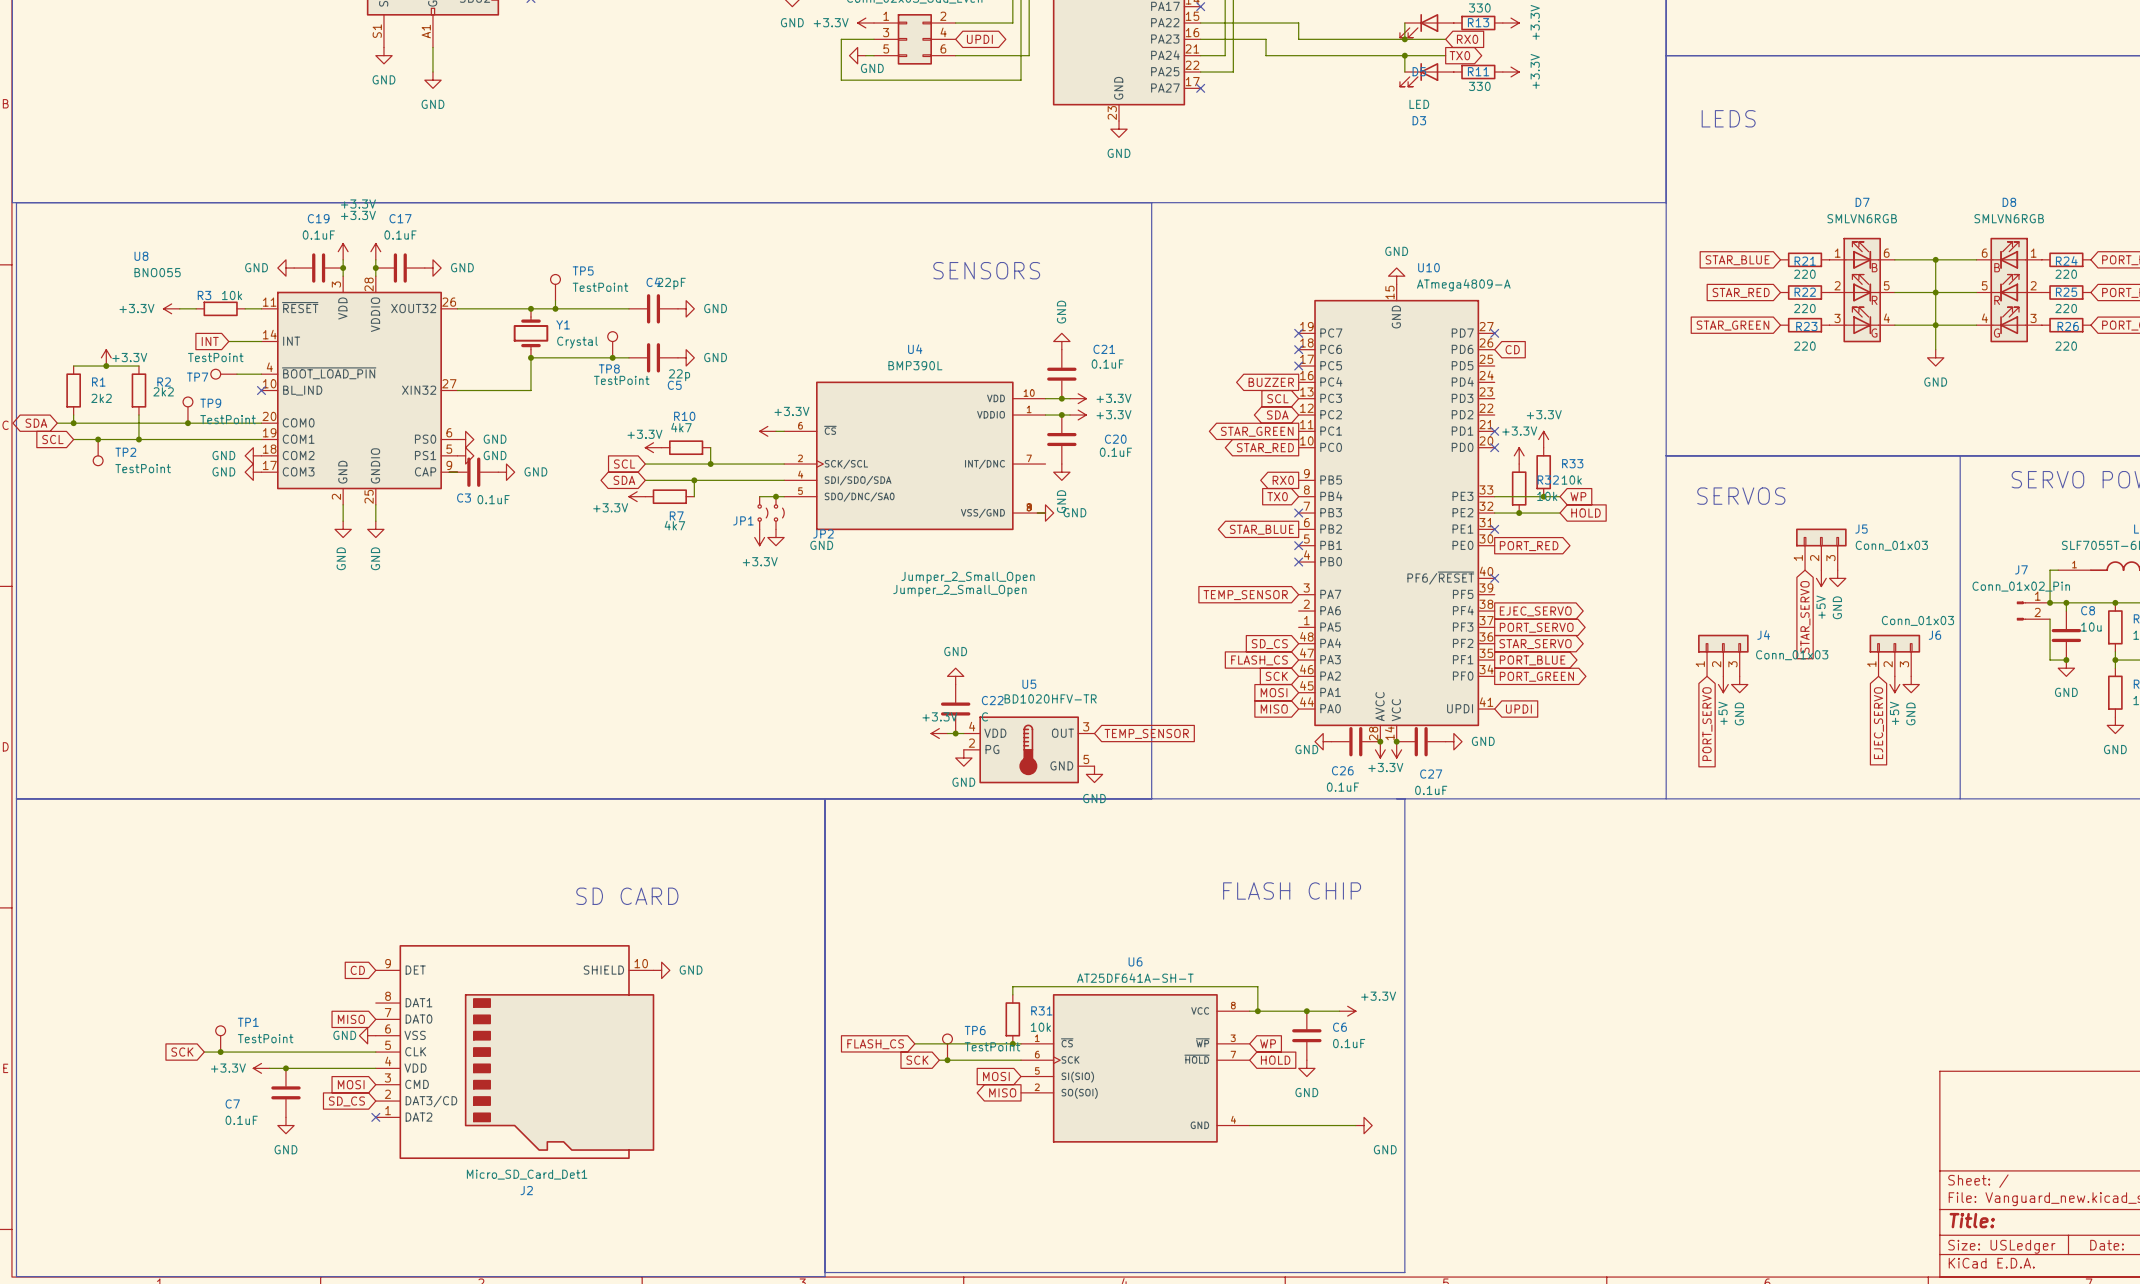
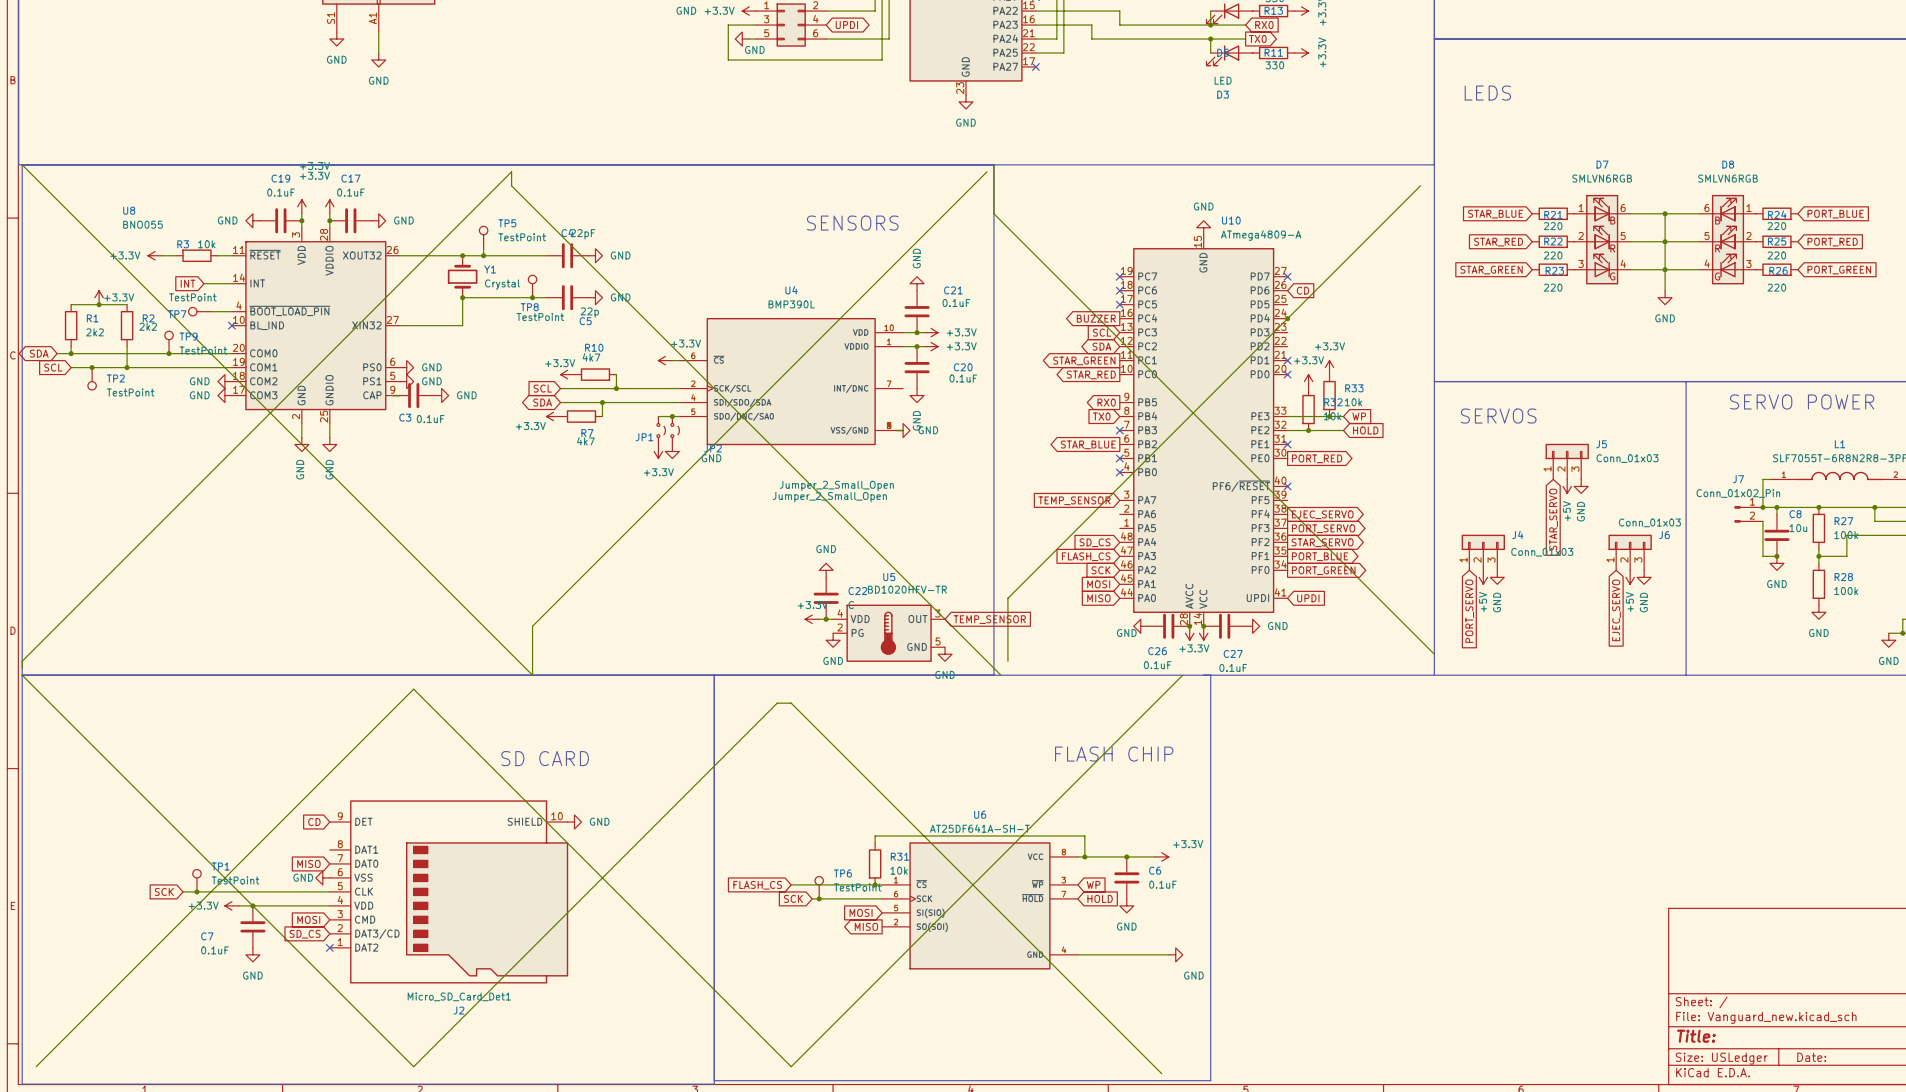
wire: none -> (22, 164) (532, 675) (532, 626) (986, 171)
wire: none -> (993, 164) (993, 213) (1434, 654)
wire: none -> (1420, 185) (1007, 598) (1007, 661)
junction: none -> (1287, 318)
wire: none -> (22, 668) (22, 661) (511, 171) (511, 185) (1000, 675)
wire: none -> (22, 675) (413, 1066) (777, 703) (791, 703) (1161, 1073)
wire: none -> (1182, 675) (791, 1066) (413, 689) (36, 1066)

